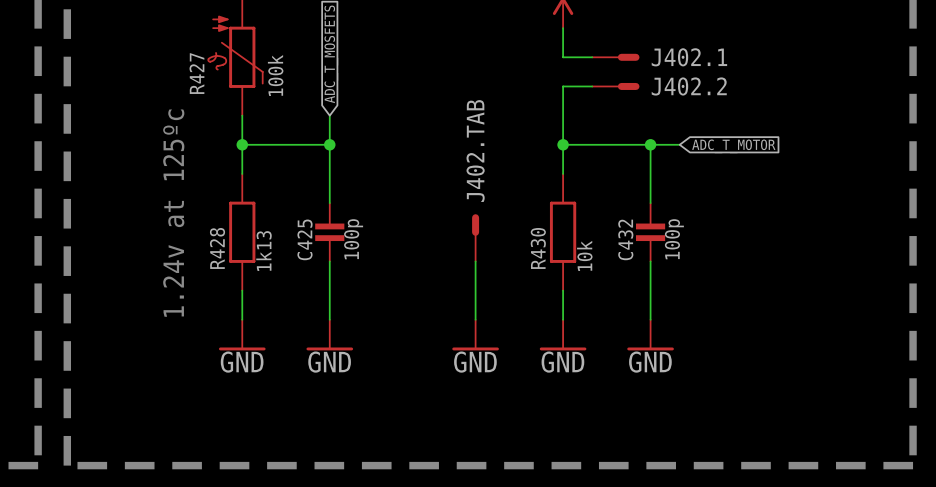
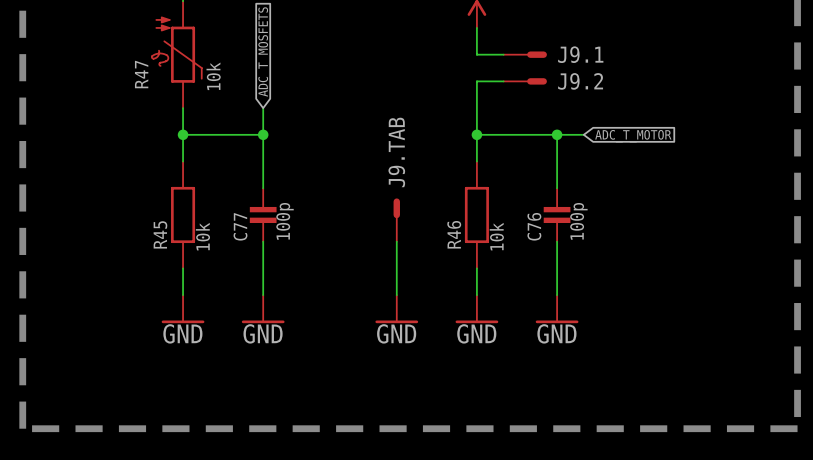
J402.1 name: J402.1 (689, 57) -> J9.1 (580, 54)
R427 name: R427 (196, 73) -> R47 (141, 74)
R427 value: 100k (275, 75) -> 10k (213, 76)
J402.2 name: J402.2 (689, 86) -> J9.2 (580, 81)
J402.TAB name: J402.TAB (475, 151) -> J9.TAB (396, 152)
text: 1.24v at 125ºc (173, 213) -> none
C425 name: C425 (304, 239) -> C77 (240, 226)
C432 name: C432 (625, 239) -> C76 (534, 226)
R428 name: R428 (217, 248) -> R45 (160, 234)
R430 name: R430 (538, 248) -> R46 (454, 234)
R428 value: 1k13 (263, 251) -> 10k (202, 236)

